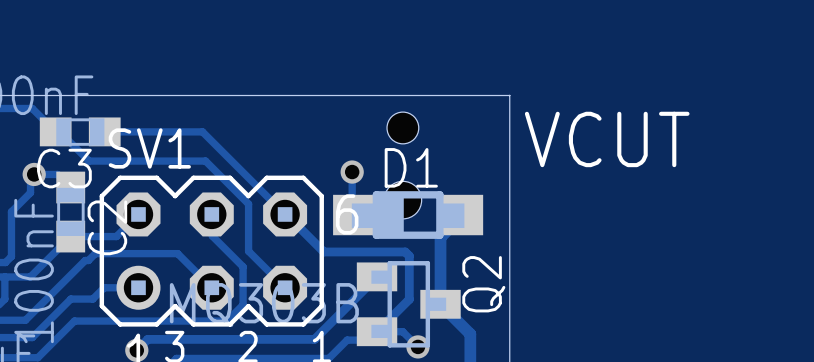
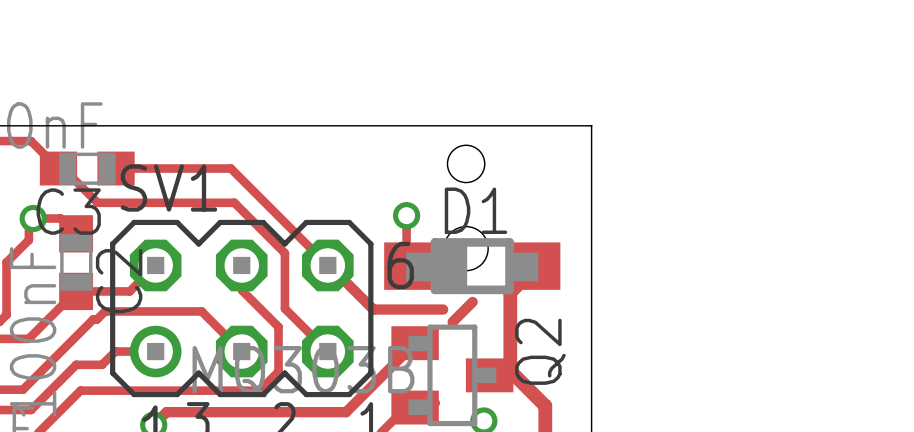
text: VCUT (607, 139) -> none
track: none -> (472, 301) (452, 321)
track: (383, 251) (405, 251) (409, 256) (409, 299) (377, 331) (402, 331) (417, 346) -> none
track: (377, 276) (314, 339) (300, 339) -> (415, 343) (346, 412)
Q2 position: (408, 304) -> (452, 375)

